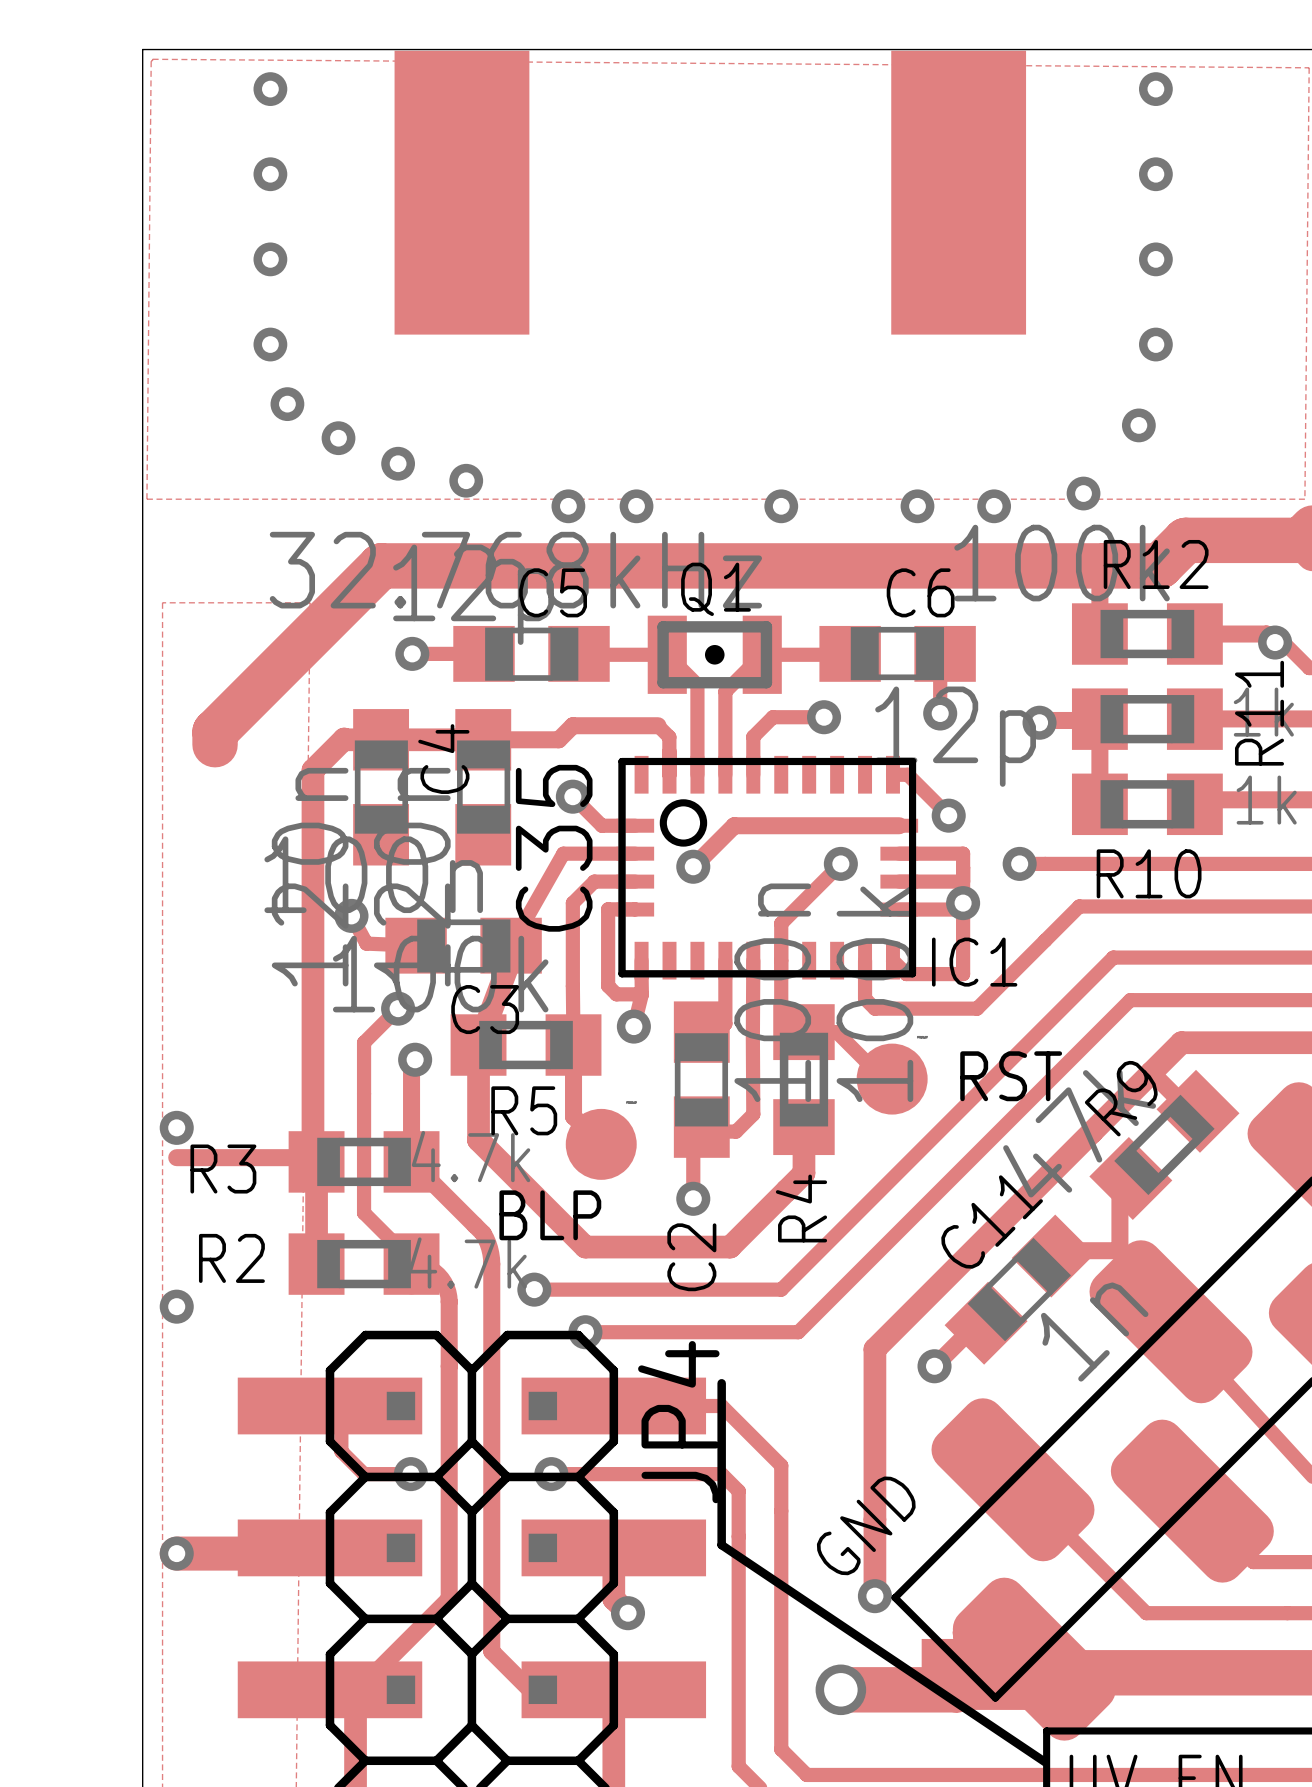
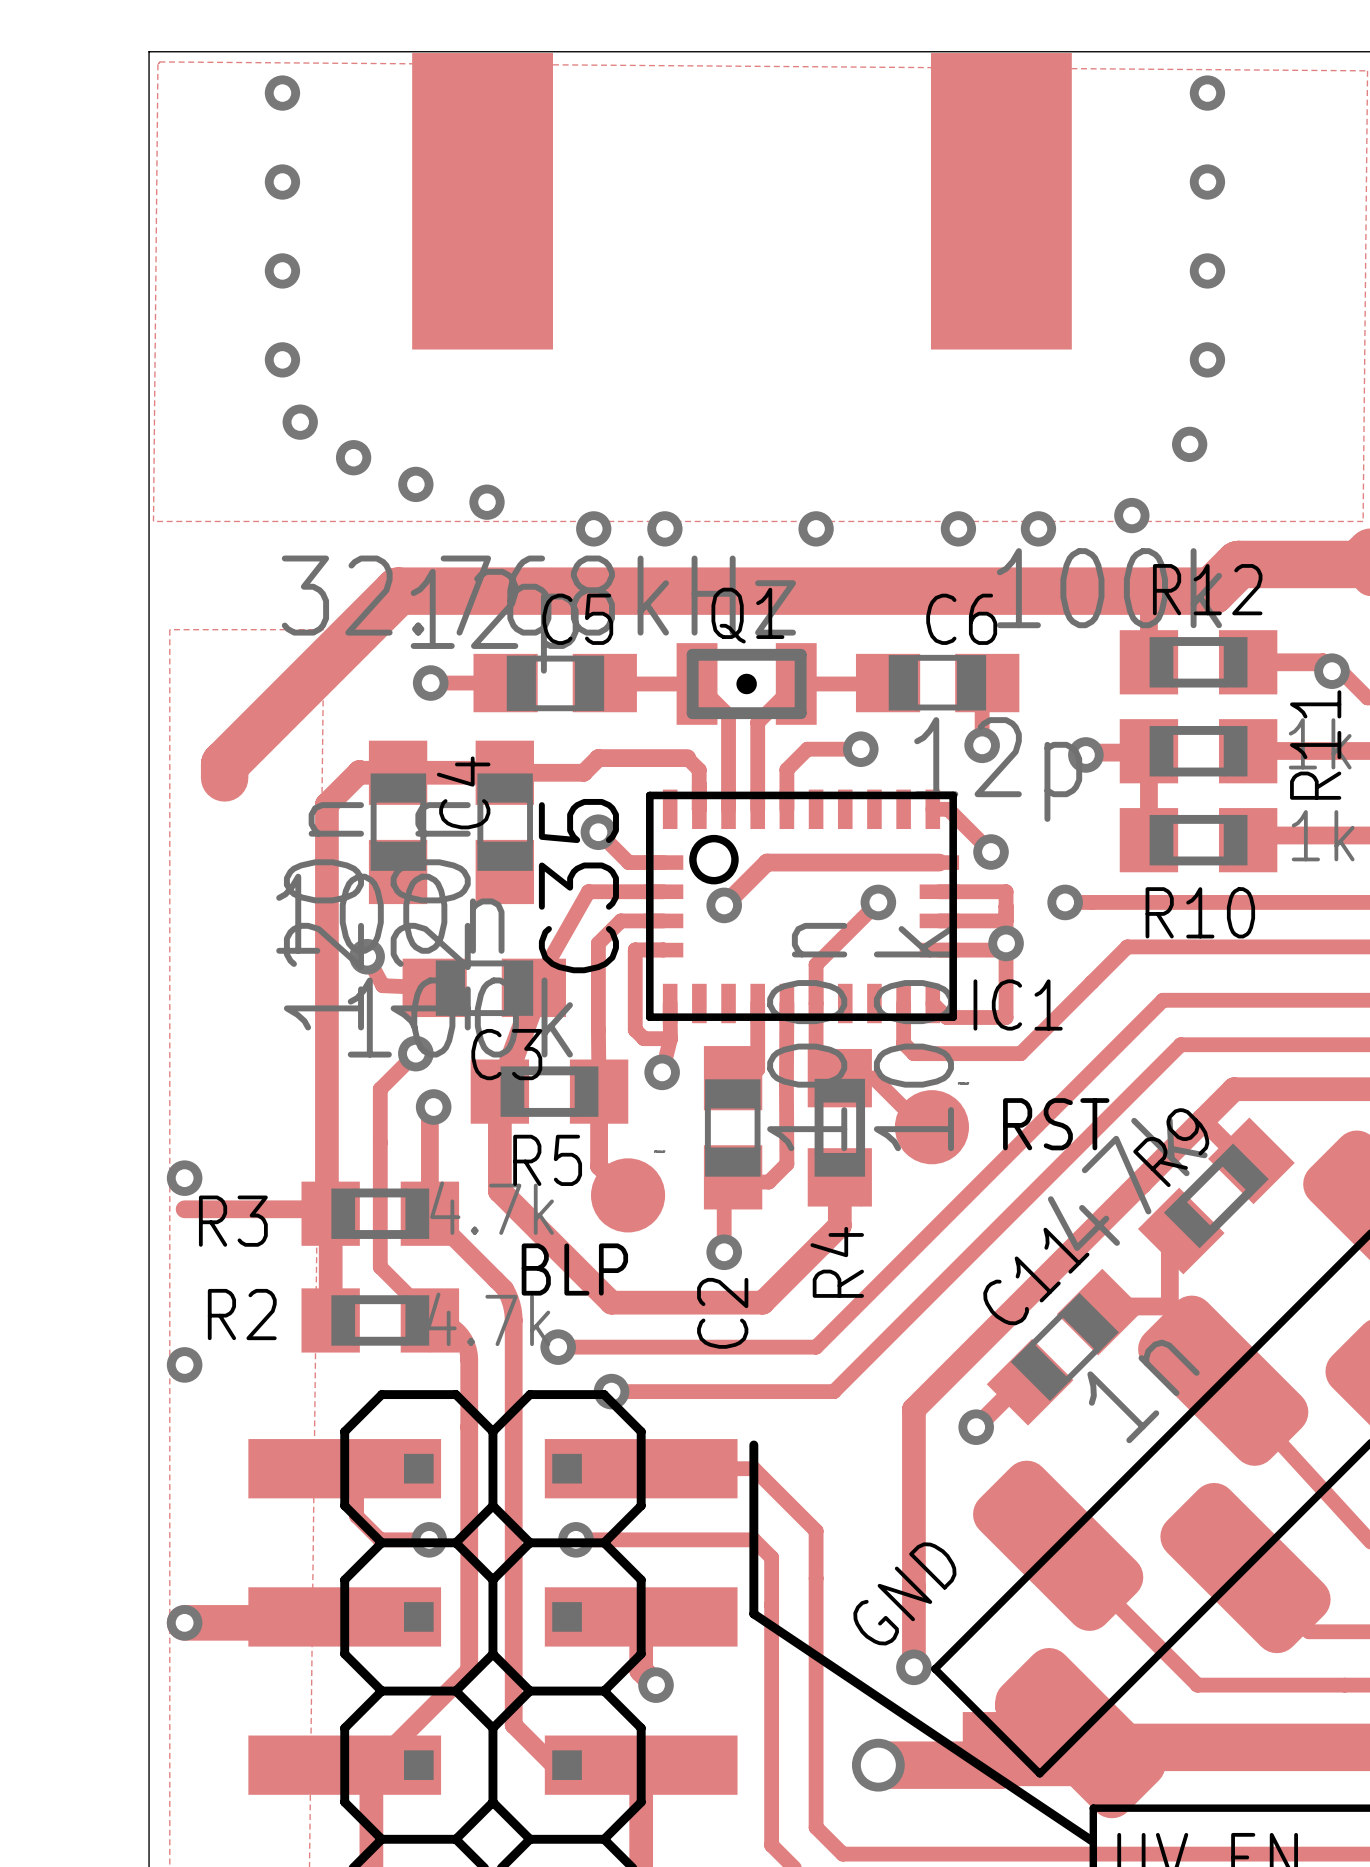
JP4 name: JP4 (678, 1422) -> none

